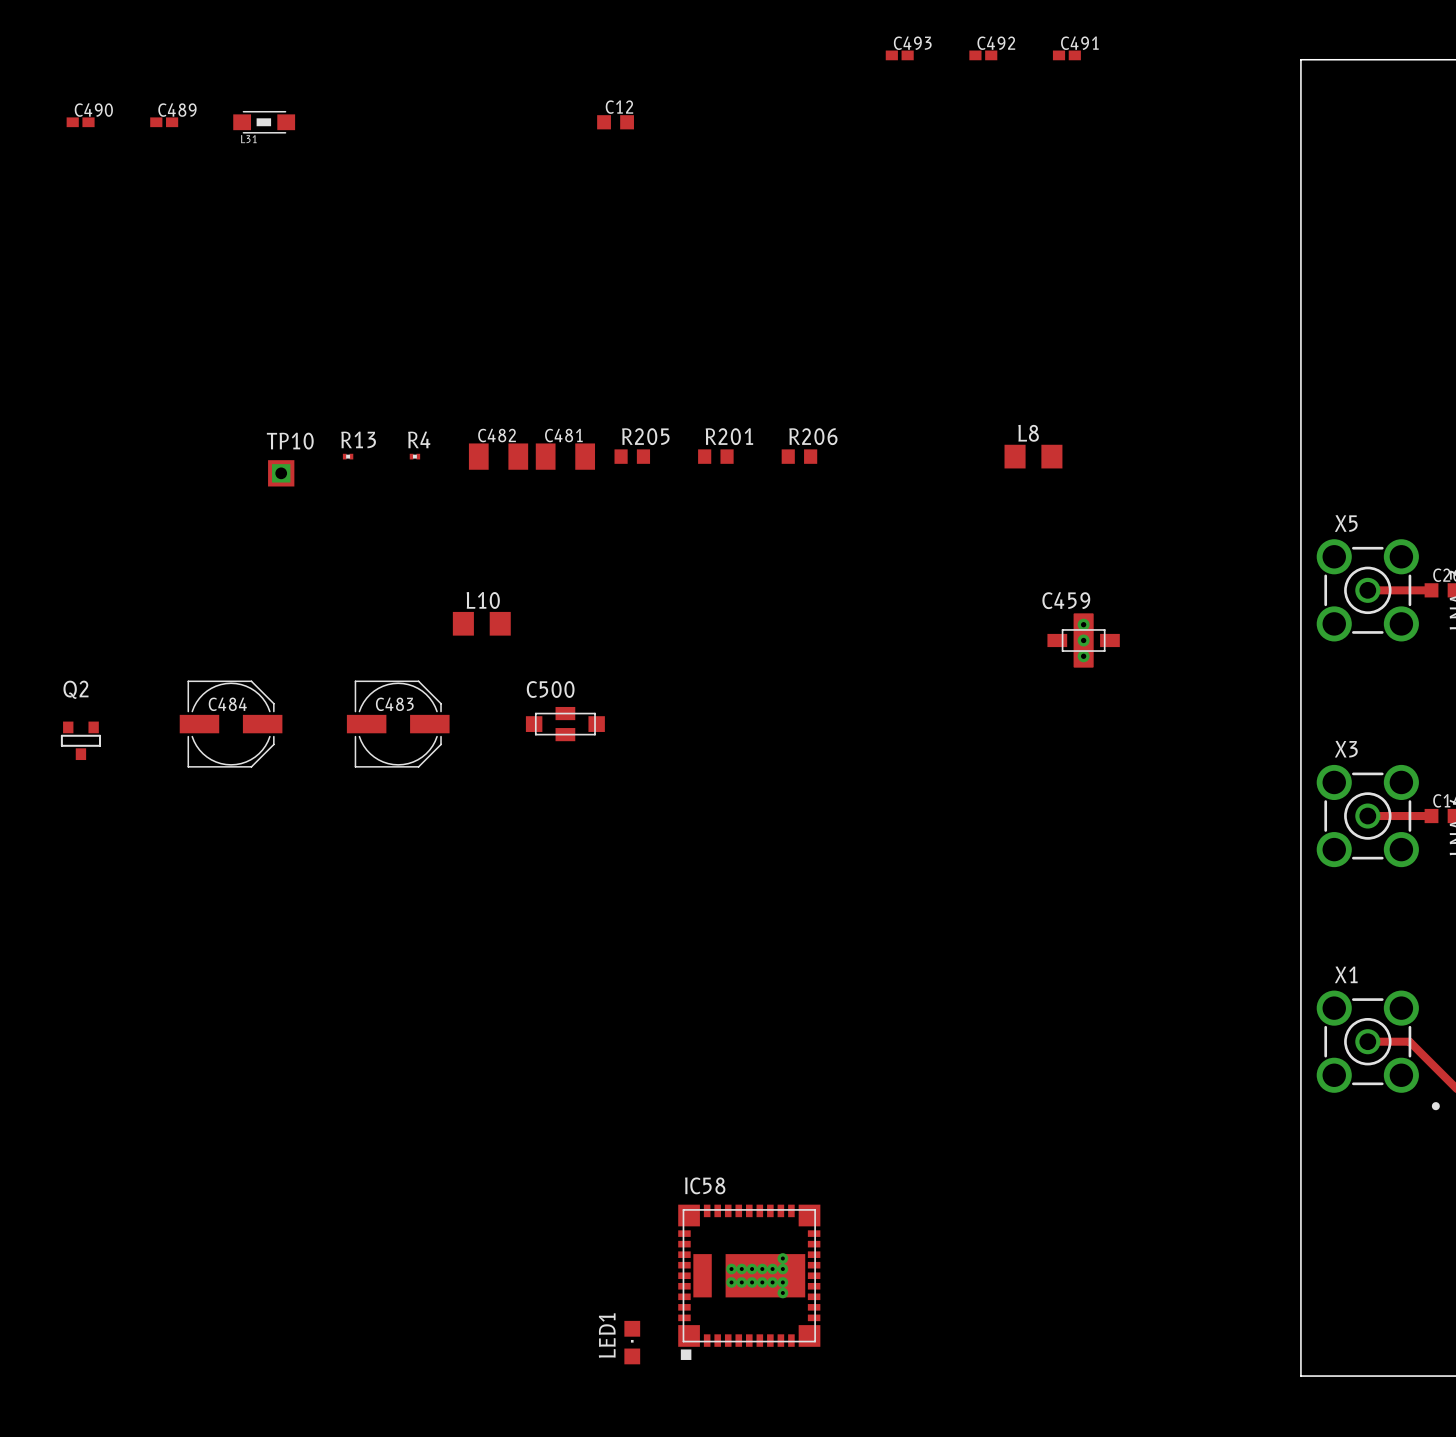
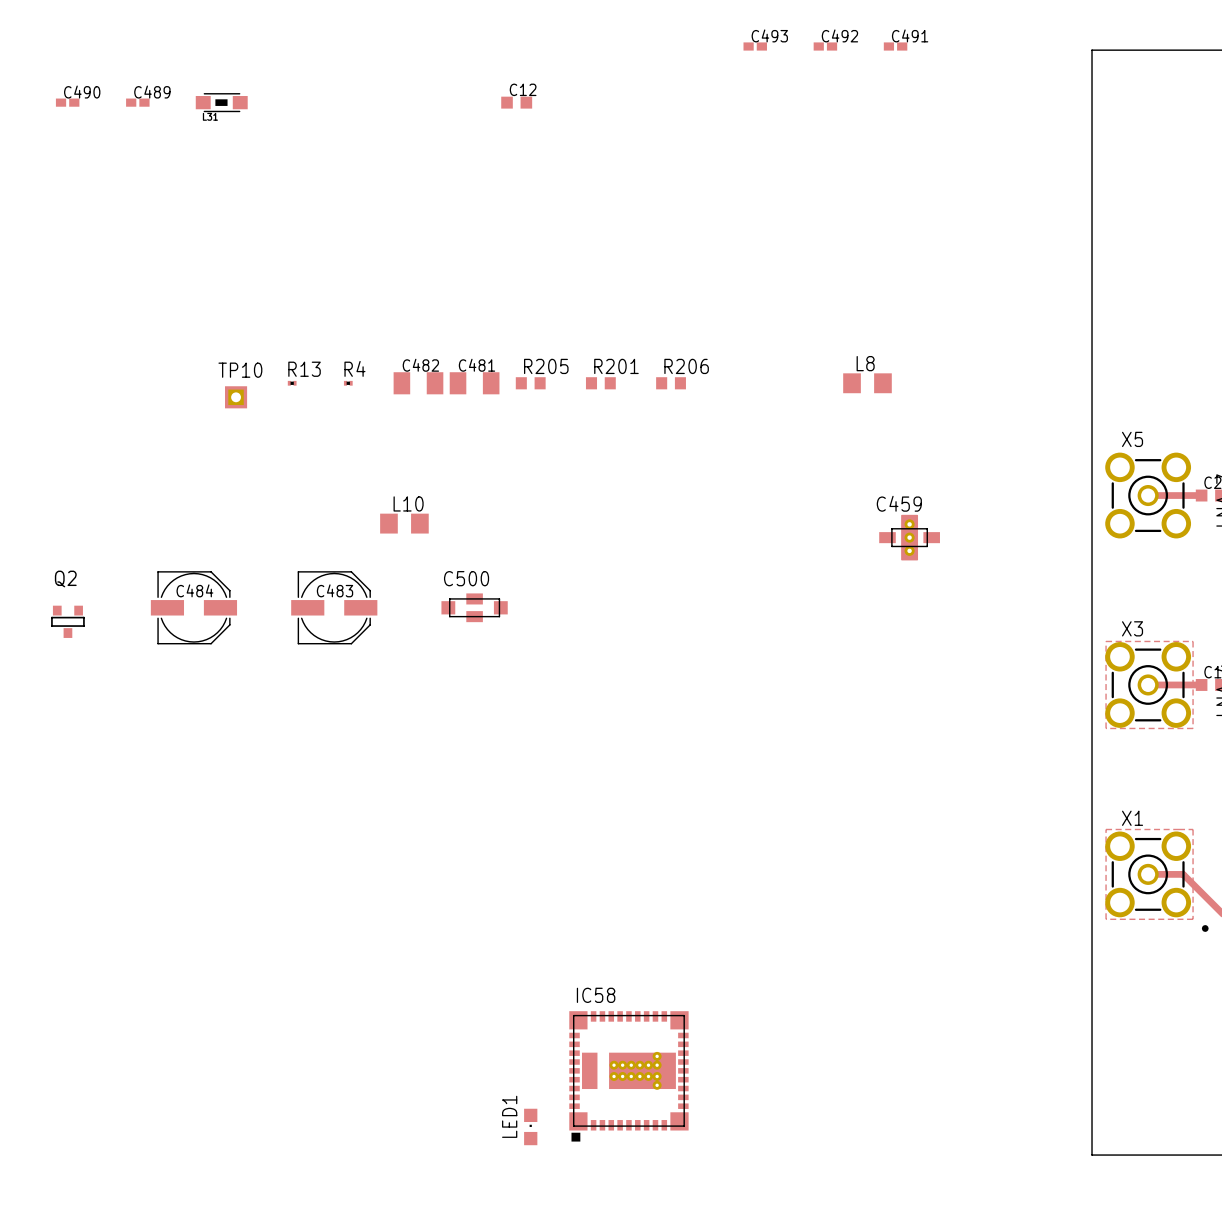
top zone outline: none -> (1106, 641) (1106, 728) (1193, 728) (1193, 641) (1106, 641)
top zone outline: none -> (1106, 829) (1193, 829) (1193, 919) (1106, 919) (1106, 829)

